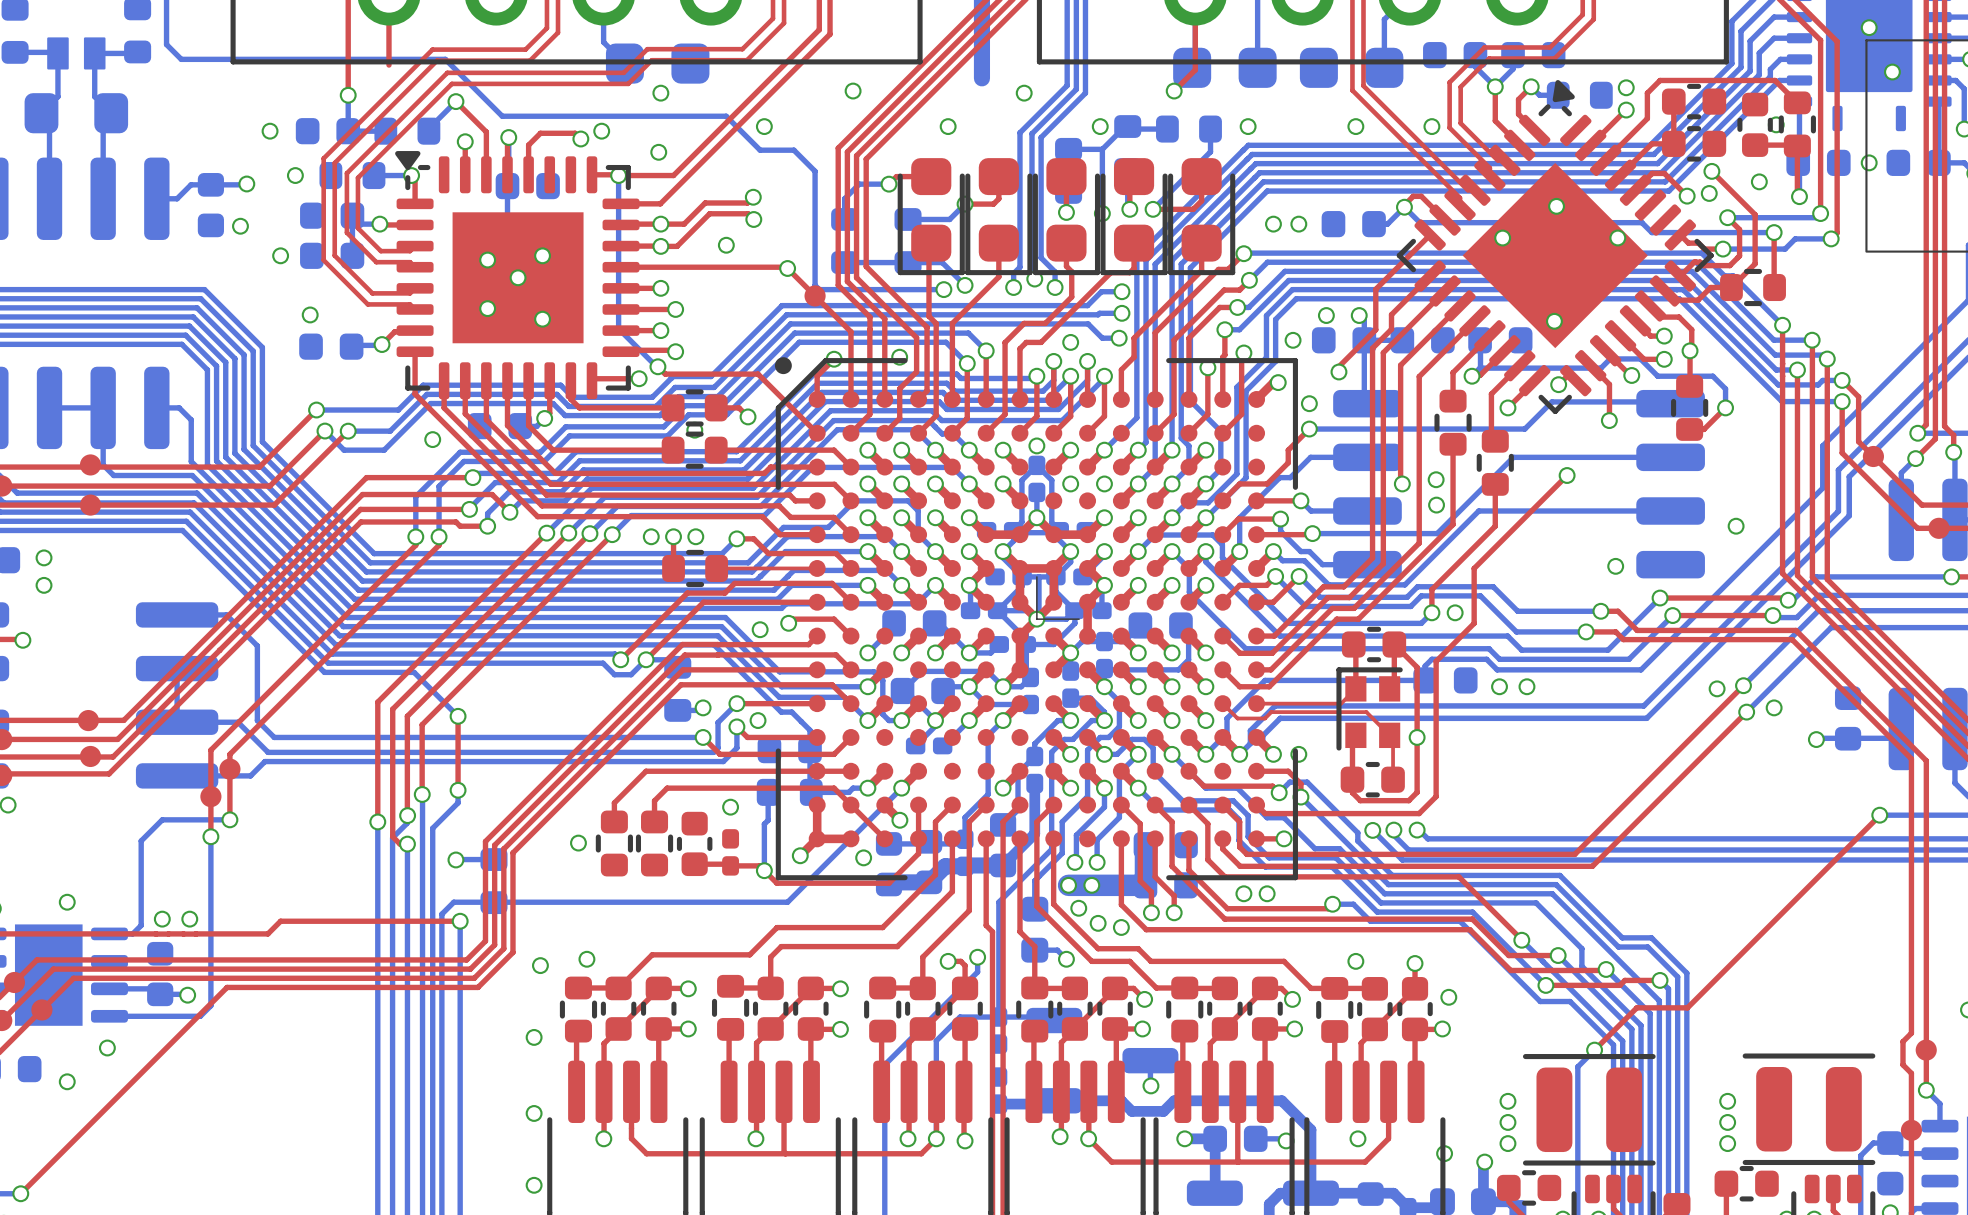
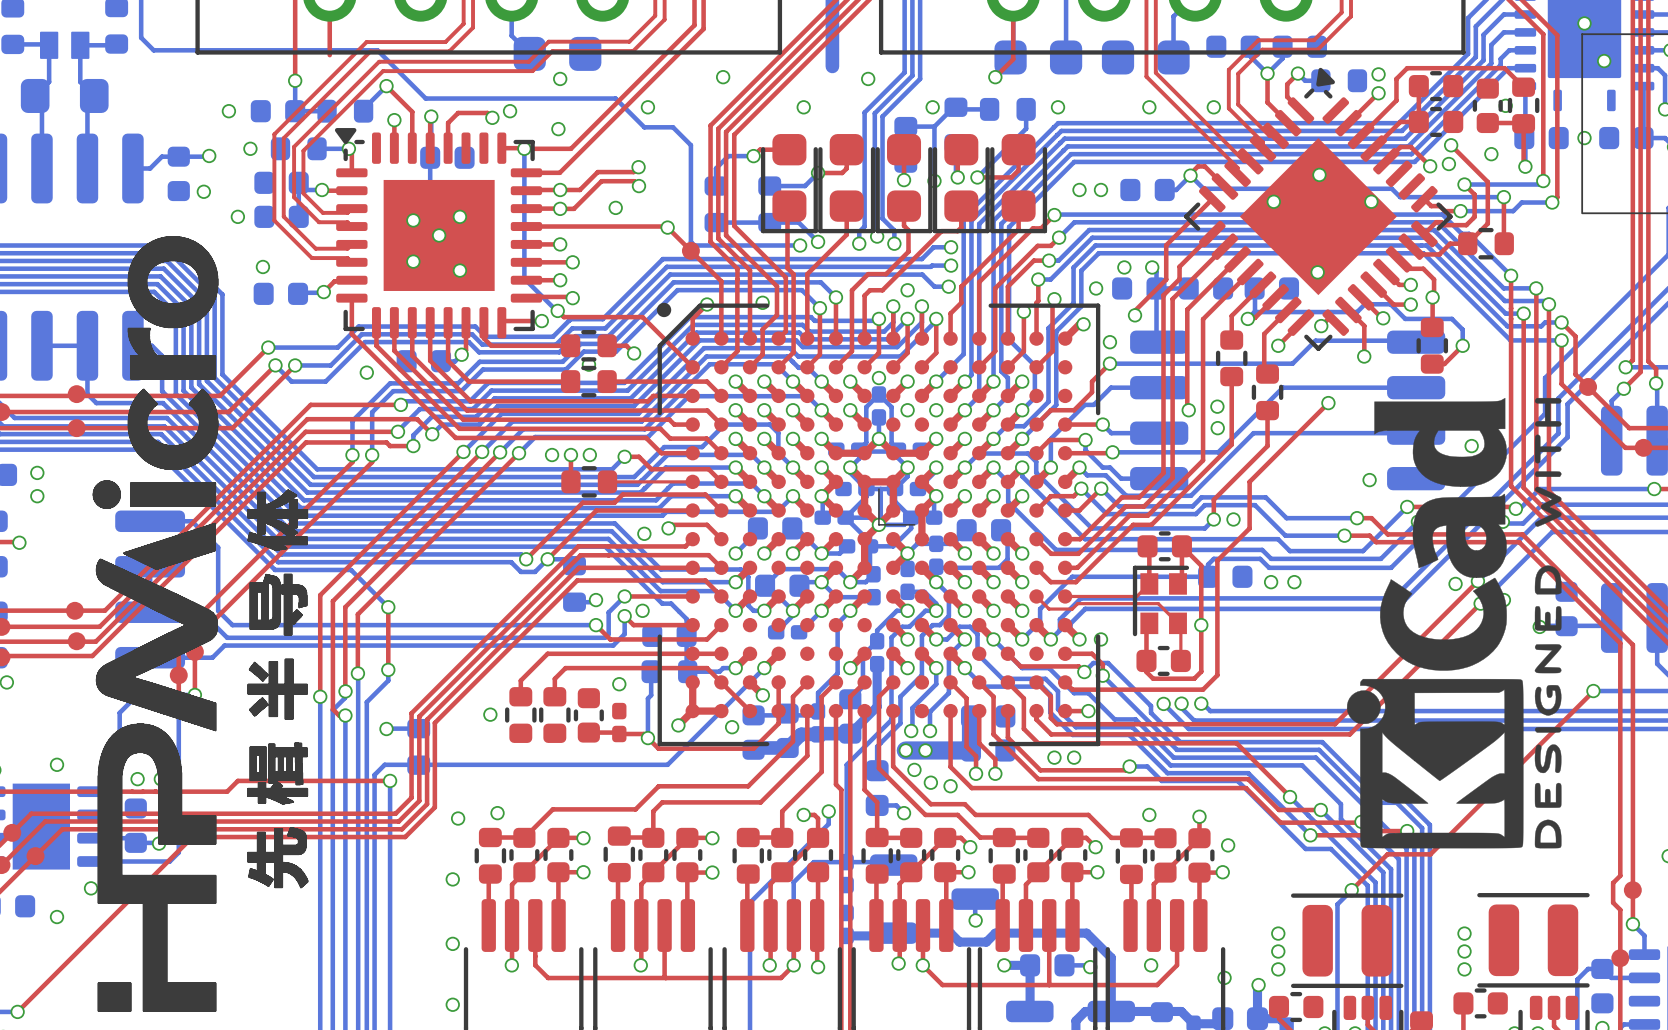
drawing: none -> [93, 236, 308, 1012]
drawing: none -> [1346, 397, 1562, 849]

